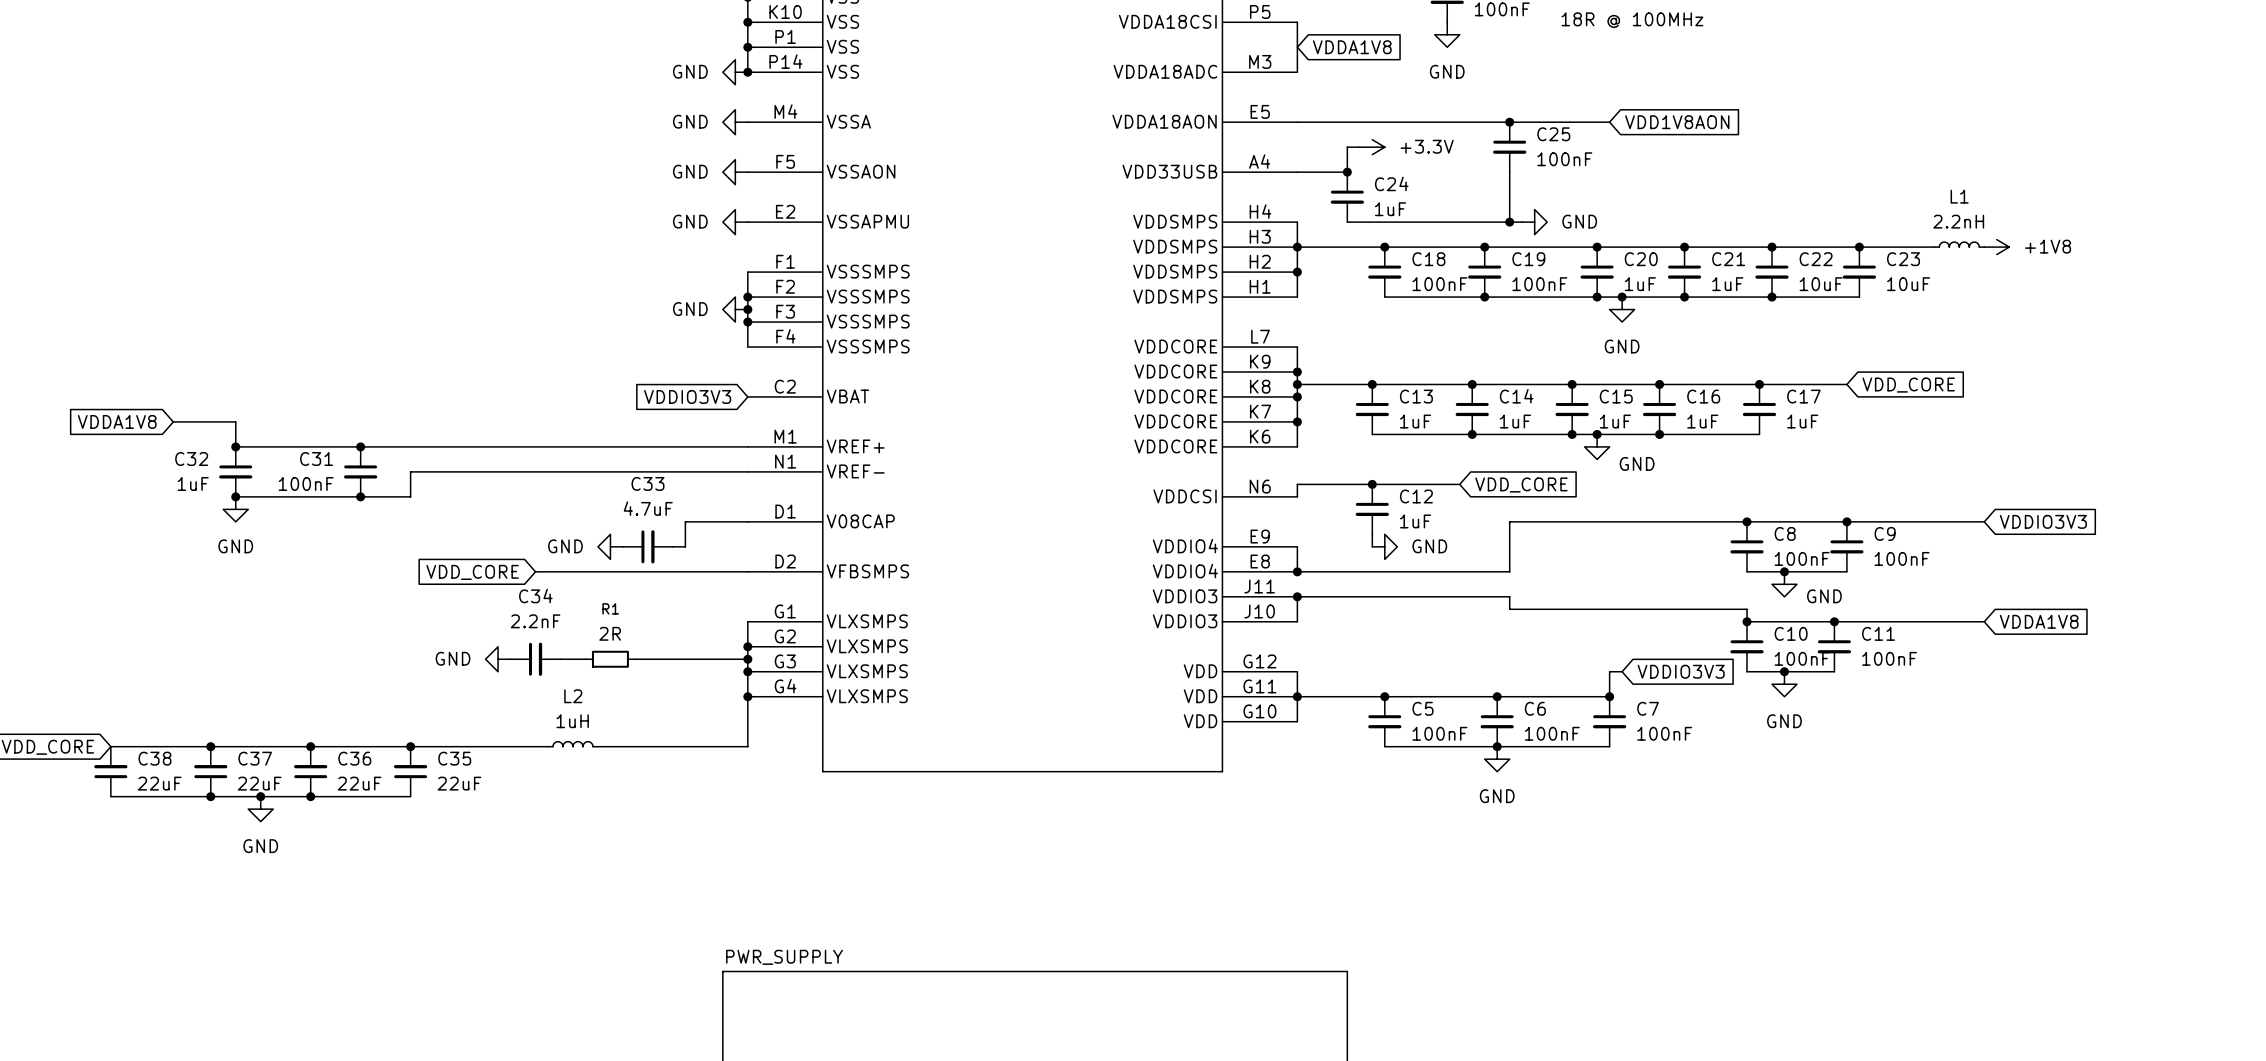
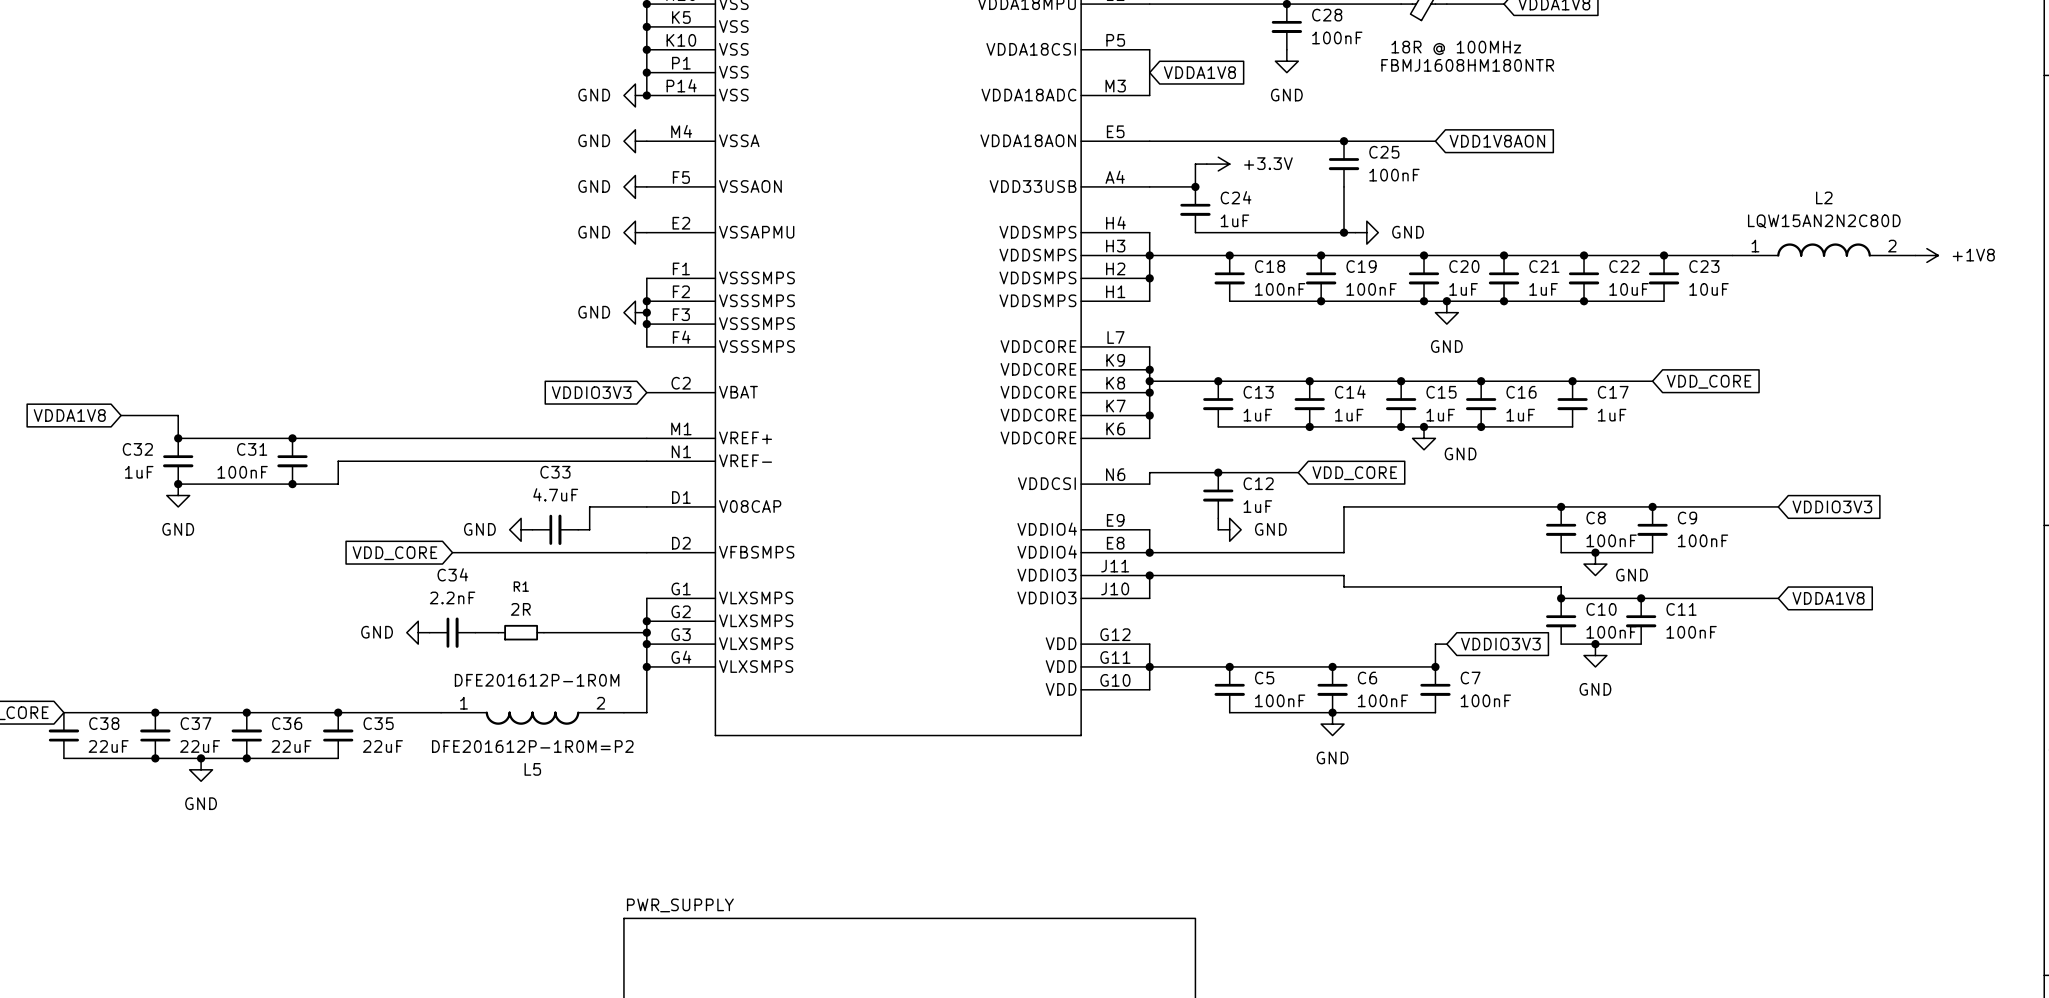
text: none -> FBMJ1608HM180NTR (1467, 65)
L1: 2.2nH (1959, 244) -> none
power symbol position: +1V8 (1996, 247) -> +1V8 (1926, 255)
text: none -> DFE201612P-1R0M (537, 680)
L2 value: 1uH (572, 721) -> LQW15AN2N2C80D (1824, 221)
L2 symbol: [548, 741, 598, 747] -> [1732, 243, 1916, 257]
wire: (597, 746) (722, 746) -> none
L5: none -> DFE201612P-1R0M=P2 (532, 718)

